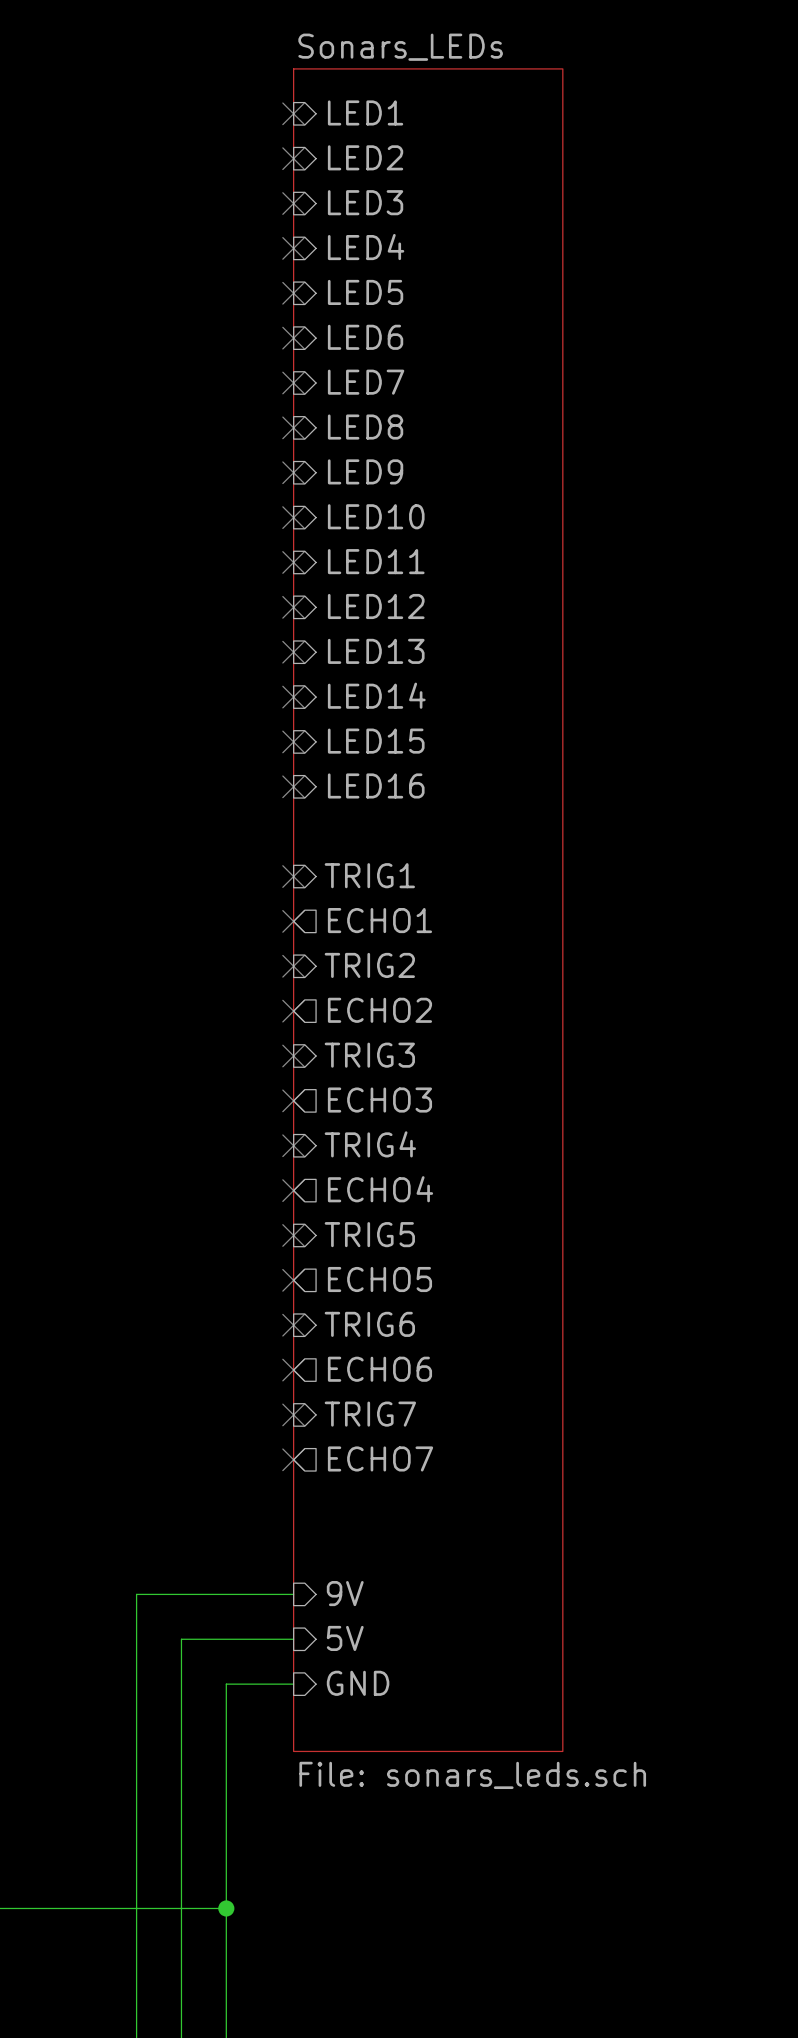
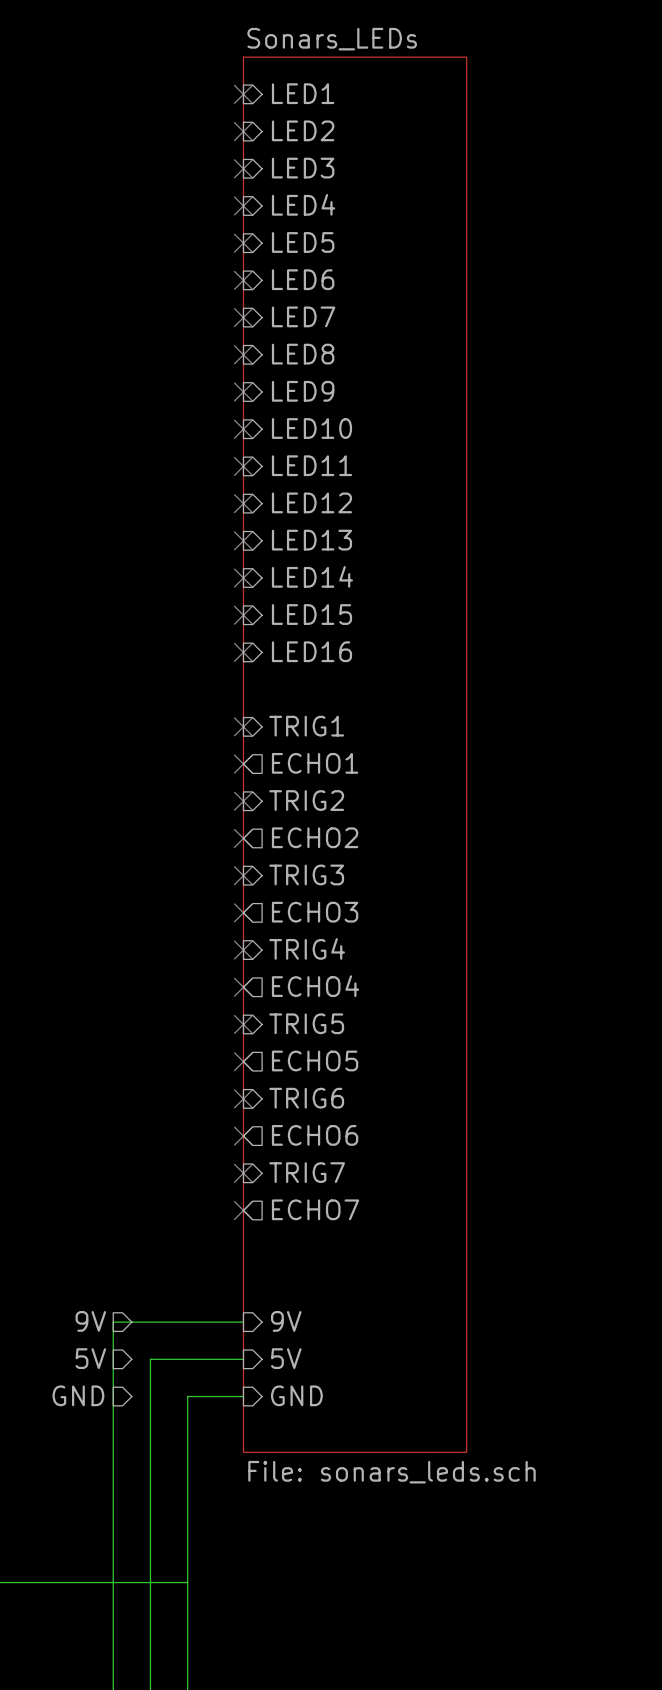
sheet pin: none -> 9V (90, 1321)
sheet pin: none -> 5V (90, 1358)
sheet pin: none -> GND (78, 1395)
junction: (226, 1908) -> none

